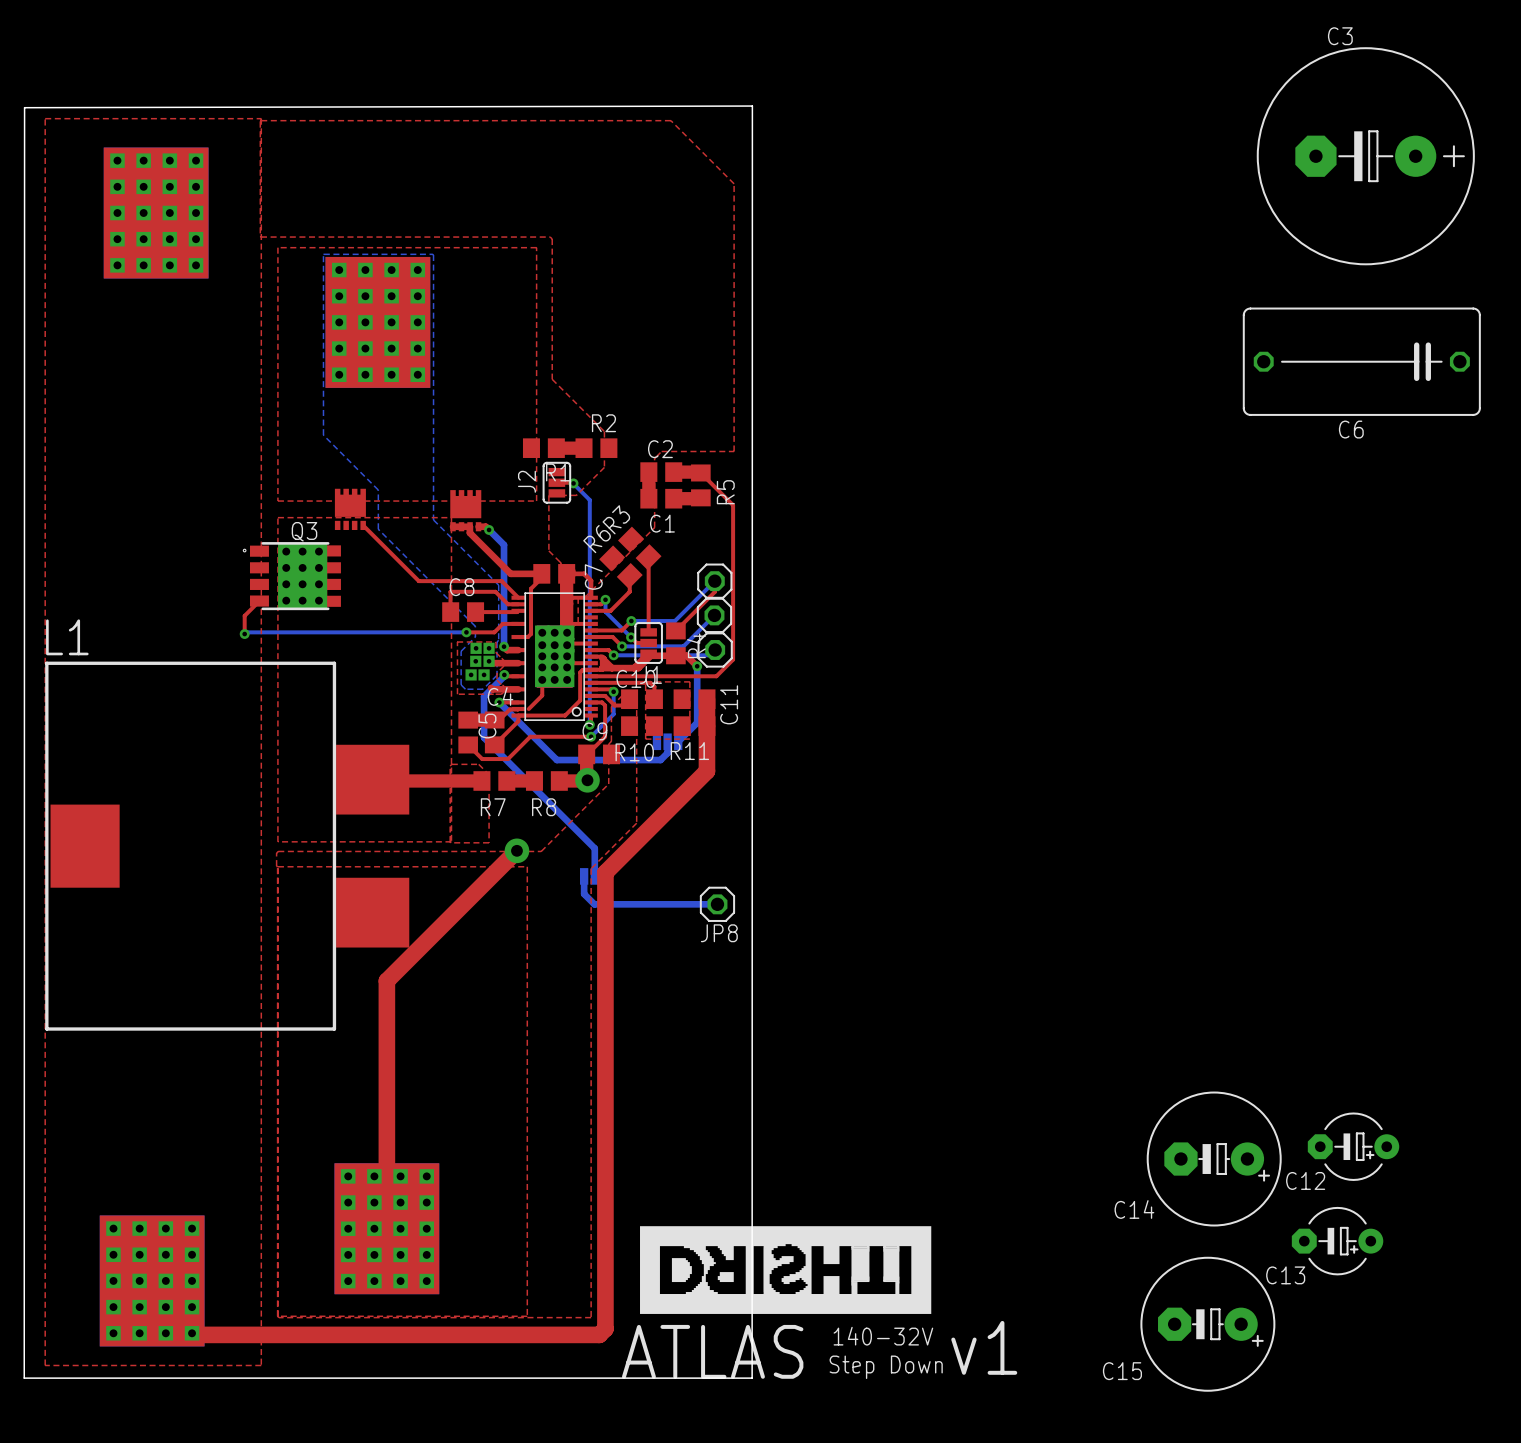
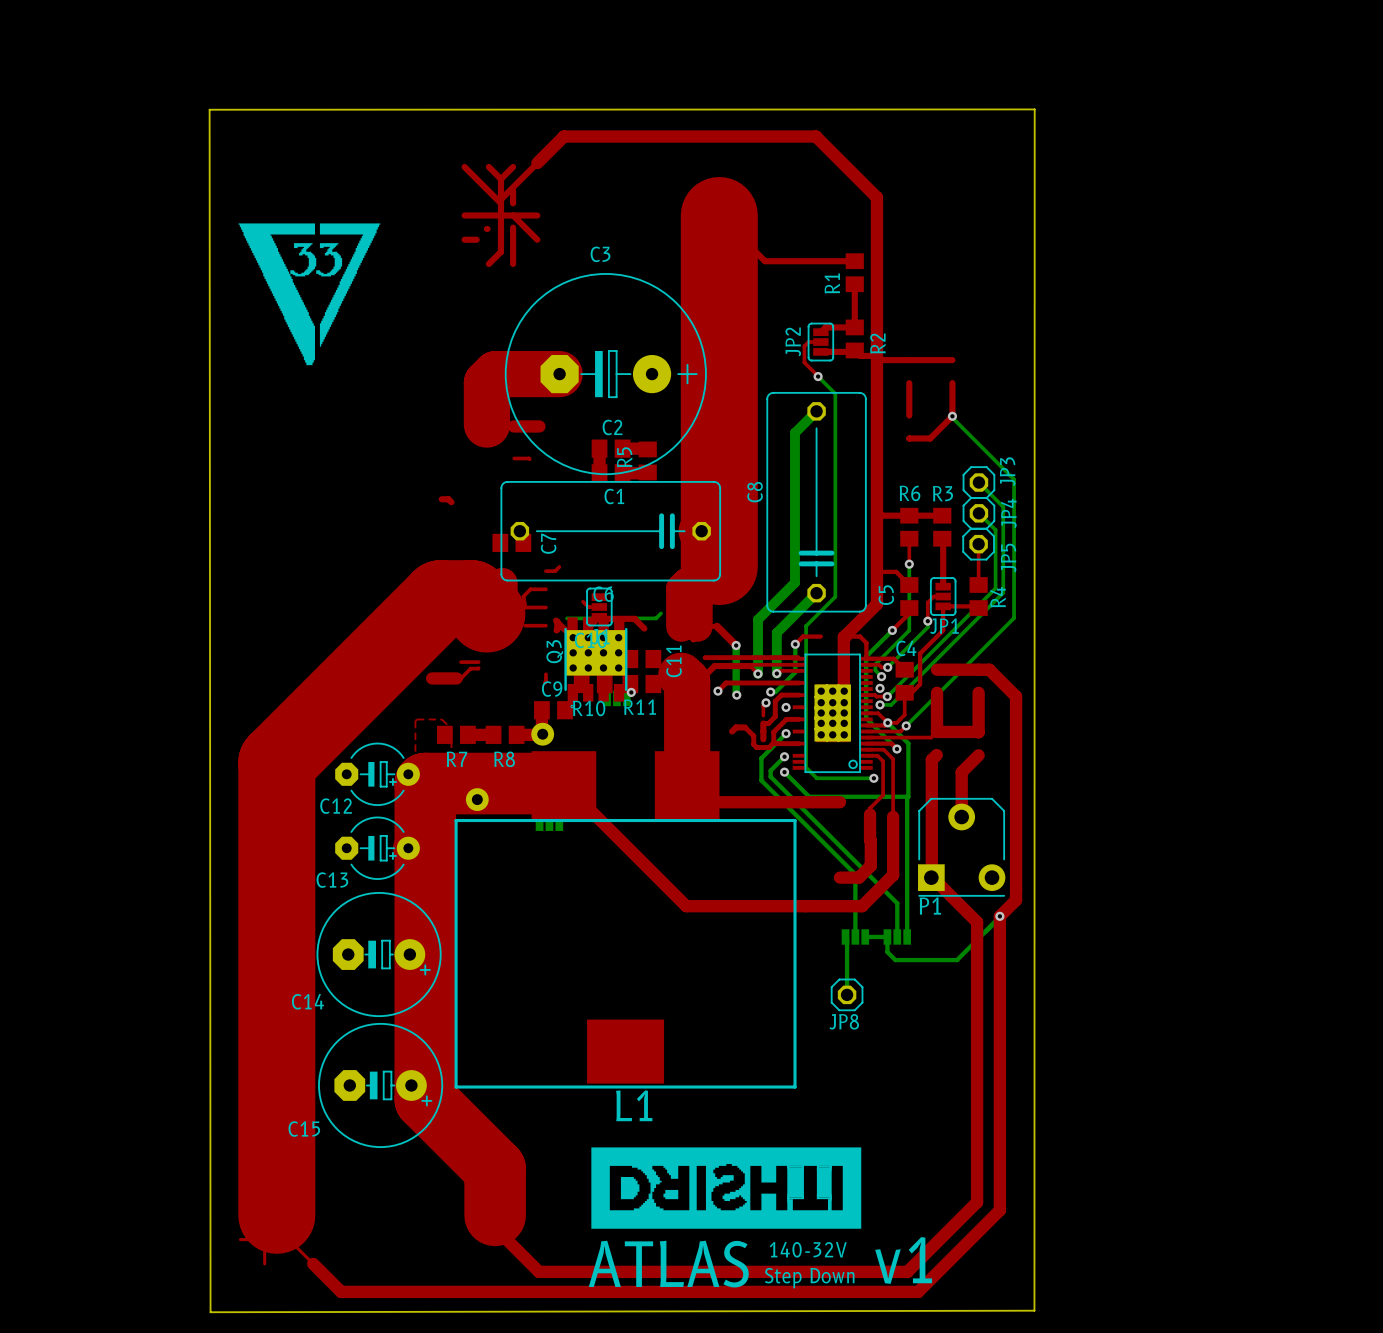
C3 name position: C3 (1340, 36) -> C3 (600, 254)
board edge: (752, 106) (752, 1378) (24, 1378) (24, 107) (752, 106) -> none
board edge: none -> (1034, 109) (1034, 1310) (210, 1312) (209, 109) (1034, 109)
top zone outline: (45, 118) (261, 118) (261, 1365) (45, 1365) (45, 118) -> none
top zone outline: (260, 120) (670, 120) (734, 183) (734, 451) (661, 451) (654, 458) (654, 527) (584, 597) (577, 597) (578, 623) (563, 623) (561, 620) (561, 563) (548, 550) (548, 495) (576, 495) (604, 467) (604, 431) (552, 379) (552, 239) (550, 237) (260, 237) (260, 120) -> none
C3 position: (1365, 156) -> (605, 374)
top track: none -> (464, 166) (500, 203)
top track: none -> (488, 166) (500, 179)
top track: none -> (513, 166) (500, 179)
top track: none -> (500, 179) (500, 251) (488, 264)
top track: none -> (513, 191) (513, 203)
top track: none -> (500, 199) (563, 136) (815, 136) (876, 197) (876, 604) (846, 636)
part: (156, 213) -> none
top track: none -> (464, 215) (537, 215)
top track: none -> (513, 215) (537, 239)
drawing: none -> [238, 223, 381, 366]
top track: none -> (513, 227) (513, 264)
top track: none -> (486, 228) (487, 228)
top track: none -> (464, 239) (476, 239)
top zone outline: (277, 247) (277, 501) (536, 501) (536, 247) (277, 247) -> none
bottom zone outline: (323, 254) (433, 254) (433, 519) (498, 585) (497, 675) (483, 689) (465, 689) (461, 684) (461, 651) (475, 637) (475, 626) (378, 529) (378, 490) (323, 435) (323, 254) -> none
top track: none -> (854, 261) (765, 261) (719, 215) (719, 566) (719, 548) (701, 531)
top track: none -> (854, 284) (854, 327) (825, 327) (820, 332)
part: (377, 322) -> none
top track: none -> (820, 342) (808, 342) (804, 346) (804, 362) (818, 376)
JP2: none -> (820, 342)
C6 position: (1361, 361) -> (610, 531)
top track: none -> (820, 351) (854, 350) (860, 355) (876, 355) (880, 360) (952, 360)
top track: none -> (559, 374) (495, 374) (486, 383) (486, 424)
bottom track: none -> (818, 376) (835, 393) (835, 596) (806, 626) (806, 767) (816, 778) (873, 778)
via: none -> (818, 376)
top track: none -> (909, 383) (909, 415)
top track: none -> (952, 383) (952, 416) (930, 438) (909, 438)
bottom track: none -> (816, 411) (795, 432) (795, 582) (758, 619) (758, 673)
bottom track: none -> (952, 416) (1014, 479) (1014, 618) (906, 725)
via: none -> (952, 416)
R1 rotation: 0° (543, 448) -> 90° clockwise (854, 272)
R1 position: (543, 448) -> (854, 272)
R2 rotation: 0° (596, 448) -> 90° clockwise (854, 338)
R2 position: (596, 448) -> (854, 338)
top track: (700, 472) (733, 505) (733, 659) (716, 676) (591, 676) -> none
J2: (556, 482) -> none
bottom track: (573, 483) (589, 500) (589, 724) -> none
via: (573, 483) -> none
R5 name position: R5 (725, 492) -> R5 (624, 457)
bottom track: none -> (978, 482) (1003, 506) (1003, 592) (891, 704) (880, 704)
JP3: none -> (978, 482)
part: (350, 509) -> none
part: (465, 510) -> none
top zone outline: (277, 517) (277, 841) (451, 841) (451, 517) (277, 517) -> none
top track: (363, 525) (418, 581) (501, 581) (518, 597) -> none
top track: (453, 526) (469, 526) (469, 532) (510, 573) (541, 573) (541, 577) (531, 588) (531, 634) (528, 637) (518, 637) -> none
bottom track: (489, 529) (504, 544) (504, 646) -> none
via: (489, 529) -> none
top track: none -> (876, 510) (882, 515) (942, 515)
bottom track: none -> (978, 513) (995, 529) (995, 588) (887, 696)
JP4: none -> (978, 513)
R3 rotation: 0° (639, 548) -> 45° clockwise (942, 527)
R3 position: (639, 548) -> (942, 527)
top track: (648, 557) (648, 632) -> none
R6 rotation: 0° (620, 567) -> 45° clockwise (909, 527)
R6 position: (620, 567) -> (909, 527)
top track: none -> (909, 538) (909, 564)
top track: none -> (942, 538) (943, 586)
top track: (629, 575) (629, 591) (610, 610) (591, 610) -> none
top track: none -> (978, 544) (978, 585)
JP5: none -> (978, 544)
Q3 rotation: 0° (291, 576) -> 90° counterclockwise (595, 662)
Q3 position: (291, 576) -> (595, 662)
top track: (714, 581) (714, 592) (675, 630) -> none
bottom track: (714, 581) (674, 621) (631, 621) -> none
part: (714, 581) -> none
C8 name position: C8 (461, 587) -> C8 (755, 492)
bottom track: none -> (909, 564) (909, 630) (875, 664) (875, 670) (881, 676)
via: none -> (909, 564)
bottom track: (605, 599) (605, 611) (631, 637) -> none
via: (605, 599) -> none
top track: (259, 601) (244, 615) (244, 634) -> none
C8 footprint: [442, 602, 485, 622] -> [766, 391, 867, 613]
top track: (566, 603) (572, 597) (591, 597) (591, 580) (584, 573) (566, 573) (566, 631) (554, 643) (554, 632) -> none
top track: (518, 604) (508, 604) (495, 591) (450, 591) (450, 612) -> none
top track: none -> (876, 571) (896, 571) (909, 585)
top track: (518, 610) (475, 612) -> none
bottom track: (714, 615) (683, 646) (622, 646) -> none
part: (714, 615) -> none
top track: none -> (502, 583) (502, 614) (486, 614) (471, 598) (440, 598) (276, 762) (276, 1215)
top track: (631, 621) (621, 630) (591, 630) -> none
via: (631, 621) -> none
top track: (518, 623) (502, 623) (494, 632) (466, 632) -> none
bottom track: none -> (816, 593) (776, 632) (776, 673)
top track: none -> (943, 596) (933, 596) (927, 602) (927, 621)
JP1: none -> (943, 596)
bottom track: (466, 632) (246, 632) (244, 634) -> none
via: (466, 632) -> none
via: (244, 634) -> none
L1 name position: L1 (67, 637) -> L1 (634, 1105)
top track: (591, 637) (612, 637) (622, 646) -> none
via: (631, 637) -> none
top zone outline: (457, 642) (496, 642) (496, 652) (504, 660) (504, 665) (497, 672) (497, 680) (503, 685) (501, 694) (457, 694) (457, 642) -> none
R4 position: (675, 643) -> (978, 596)
top track: none -> (909, 608) (909, 613) (892, 630)
top track: none -> (978, 608) (976, 606) (943, 606) (943, 630) (920, 653) (920, 684) (911, 692) (904, 692) (904, 714) (896, 722) (887, 722)
top track: (567, 645) (542, 669) (542, 695) (528, 709) -> none
via: (504, 646) -> none
via: (622, 646) -> none
part: (476, 648) -> none
part: (489, 648) -> none
part: (715, 649) -> none
top track: (591, 650) (608, 650) (613, 655) -> none
via: (613, 655) -> none
top track: (650, 655) (638, 668) (602, 668) -> none
part: (554, 656) -> none
top track: (591, 656) (600, 656) (603, 659) (603, 666) (600, 669) (582, 670) (580, 672) (580, 700) (565, 715) (518, 715) (518, 721) (494, 744) -> none
bottom track: none -> (927, 621) (927, 627) (887, 667)
via: none -> (927, 621)
part: (475, 661) -> none
part: (489, 661) -> none
bottom track: (697, 666) (697, 722) (678, 741) -> none
via: (697, 666) -> none
bottom track: none -> (892, 630) (866, 656) (866, 718) (896, 749)
via: none -> (892, 630)
part: (471, 674) -> none
part: (484, 674) -> none
bottom track: (504, 674) (484, 696) (484, 737) (594, 848) (594, 876) -> none
via: (504, 674) -> none
top track: none -> (820, 636) (803, 636) (795, 644)
top track: none -> (693, 639) (697, 635) (697, 626) (697, 588) (692, 588) (687, 583) (681, 588) (681, 626) (705, 626) (717, 626) (736, 645)
top zone outline: (645, 681) (689, 681) (689, 739) (645, 739) (645, 681) -> none
top track: (591, 682) (650, 682) (654, 686) (654, 699) -> none
bottom track: none -> (795, 644) (795, 672) (775, 692) (770, 692)
via: none -> (795, 644)
bottom track: none -> (736, 645) (736, 695)
via: none -> (736, 645)
top track: (491, 687) (518, 689) -> none
top track: (591, 689) (611, 689) (613, 691) -> none
top zone outline: (627, 690) (611, 706) (608, 783) (541, 851) (278, 851) (276, 853) (278, 1317) (591, 1317) (591, 868) (636, 823) (636, 690) (627, 690) -> none
bottom track: (613, 691) (613, 714) (591, 736) -> none
via: (613, 691) -> none
top track: (591, 695) (605, 695) (614, 705) (622, 705) (629, 699) -> none
top track: none -> (705, 657) (799, 658)
top track: (706, 699) (706, 771) (605, 872) (605, 1328) (599, 1334) (193, 1334) (192, 1333) -> none
bottom track: (499, 702) (556, 760) (660, 760) (667, 753) (667, 741) -> none
via: (499, 702) -> none
top track: (591, 702) (602, 702) (605, 705) (605, 736) (590, 751) (586, 751) (586, 754) -> none
top track: none -> (799, 664) (748, 664) (757, 673)
top track: none -> (866, 664) (878, 664) (881, 667) (887, 667)
top track: none -> (750, 666) (714, 666) (705, 675) (681, 675) (687, 681) (687, 799) (690, 802) (839, 802)
via: none -> (887, 667)
top track: none -> (904, 669) (893, 658) (866, 658) (866, 642) (860, 636) (843, 636) (843, 690) (832, 701) (832, 691)
top track: none -> (937, 669) (989, 669) (1016, 696) (1016, 900) (999, 916) (999, 1210) (918, 1291) (341, 1291) (276, 1227)
top track: none -> (799, 670) (779, 670) (776, 673)
via: none -> (776, 673)
via: none -> (758, 673)
via: none -> (881, 676)
via: (589, 724) -> none
top track: none -> (799, 682) (726, 682) (717, 691)
C5 name position: C5 (487, 726) -> C5 (886, 595)
via: none -> (880, 688)
C5 position: (468, 732) -> (909, 596)
C4 position: (494, 732) -> (904, 681)
via: none -> (717, 691)
via: none -> (770, 692)
via: none -> (631, 692)
top track: none -> (937, 692) (937, 731) (931, 737) (866, 737)
top track: none -> (978, 692) (978, 732) (936, 731)
top track: (591, 736) (530, 736) (508, 759) (482, 759) (468, 744) -> none
via: (591, 736) -> none
via: none -> (736, 695)
top track: none -> (799, 695) (781, 695) (775, 701) (775, 716) (768, 723) (763, 723) (763, 739)
top track: none -> (866, 695) (887, 696)
via: none -> (887, 696)
top track: none -> (766, 702) (763, 705) (763, 715)
via: none -> (766, 702)
via: none -> (880, 704)
via: none -> (786, 707)
part: none -> (832, 713)
top track: none -> (866, 713) (878, 713) (887, 722)
top track: none -> (799, 719) (786, 719) (773, 732) (773, 742) (769, 747) (756, 747) (753, 744) (753, 736) (745, 727) (736, 727) (732, 731)
top track: none -> (887, 722) (885, 725) (866, 725)
bottom track: none -> (887, 722) (908, 743) (908, 796) (809, 796) (784, 772)
via: none -> (887, 722)
top track: none -> (906, 725) (900, 731) (866, 731)
via: none -> (906, 725)
top track: (372, 779) (481, 780) -> none
bottom track: none -> (786, 733) (761, 758) (761, 780) (855, 874) (855, 936)
via: none -> (786, 733)
top track: none -> (772, 743) (799, 743)
top track: none -> (866, 743) (891, 743) (896, 749)
via: none -> (896, 749)
top track: none -> (866, 749) (883, 749) (893, 759) (893, 875) (862, 906) (686, 906) (562, 783) (425, 783) (425, 1099)
top track: none -> (936, 755) (931, 759) (931, 877) (977, 922) (977, 1202) (907, 1271) (538, 1271) (495, 1228) (495, 1169) (425, 1099)
top track: none -> (866, 755) (877, 755) (883, 761) (883, 795) (870, 808) (870, 816)
top track: none -> (978, 755) (961, 772) (961, 816)
bottom track: none -> (784, 756) (770, 770) (770, 776) (897, 903) (897, 936)
via: none -> (784, 756)
via: none -> (784, 772)
via: none -> (873, 778)
L1 rotation: 0° (227, 846) -> 90° counterclockwise (625, 919)
L1 position: (227, 846) -> (625, 919)
bottom track: none -> (907, 796) (907, 936)
top track: (516, 850) (386, 980) (386, 1228) -> none
top zone outline: (277, 866) (277, 1316) (527, 1316) (527, 866) (277, 866) -> none
top track: none -> (870, 814) (870, 865) (858, 877) (839, 877)
bottom track: (584, 876) (584, 894) (594, 904) (717, 904) -> none
P1: none -> (961, 847)
JP8 position: (717, 904) -> (847, 994)
bottom track: none -> (999, 916) (957, 960) (895, 960) (887, 952) (887, 936) (865, 936)
via: none -> (999, 916)
bottom track: none -> (845, 936) (847, 994)
part: none -> (855, 936)
part: none -> (897, 936)
C12 position: (1353, 1146) -> (377, 774)
C14 position: (1214, 1159) -> (379, 954)
part: (386, 1228) -> none
C13 position: (1337, 1241) -> (377, 848)
top track: none -> (313, 1166) (291, 1188) (291, 1200)
part: (152, 1280) -> none
top track: none -> (264, 1227) (264, 1263)
top track: none -> (288, 1227) (288, 1239)
C15 position: (1207, 1324) -> (380, 1085)
top track: none -> (240, 1239) (252, 1239)

